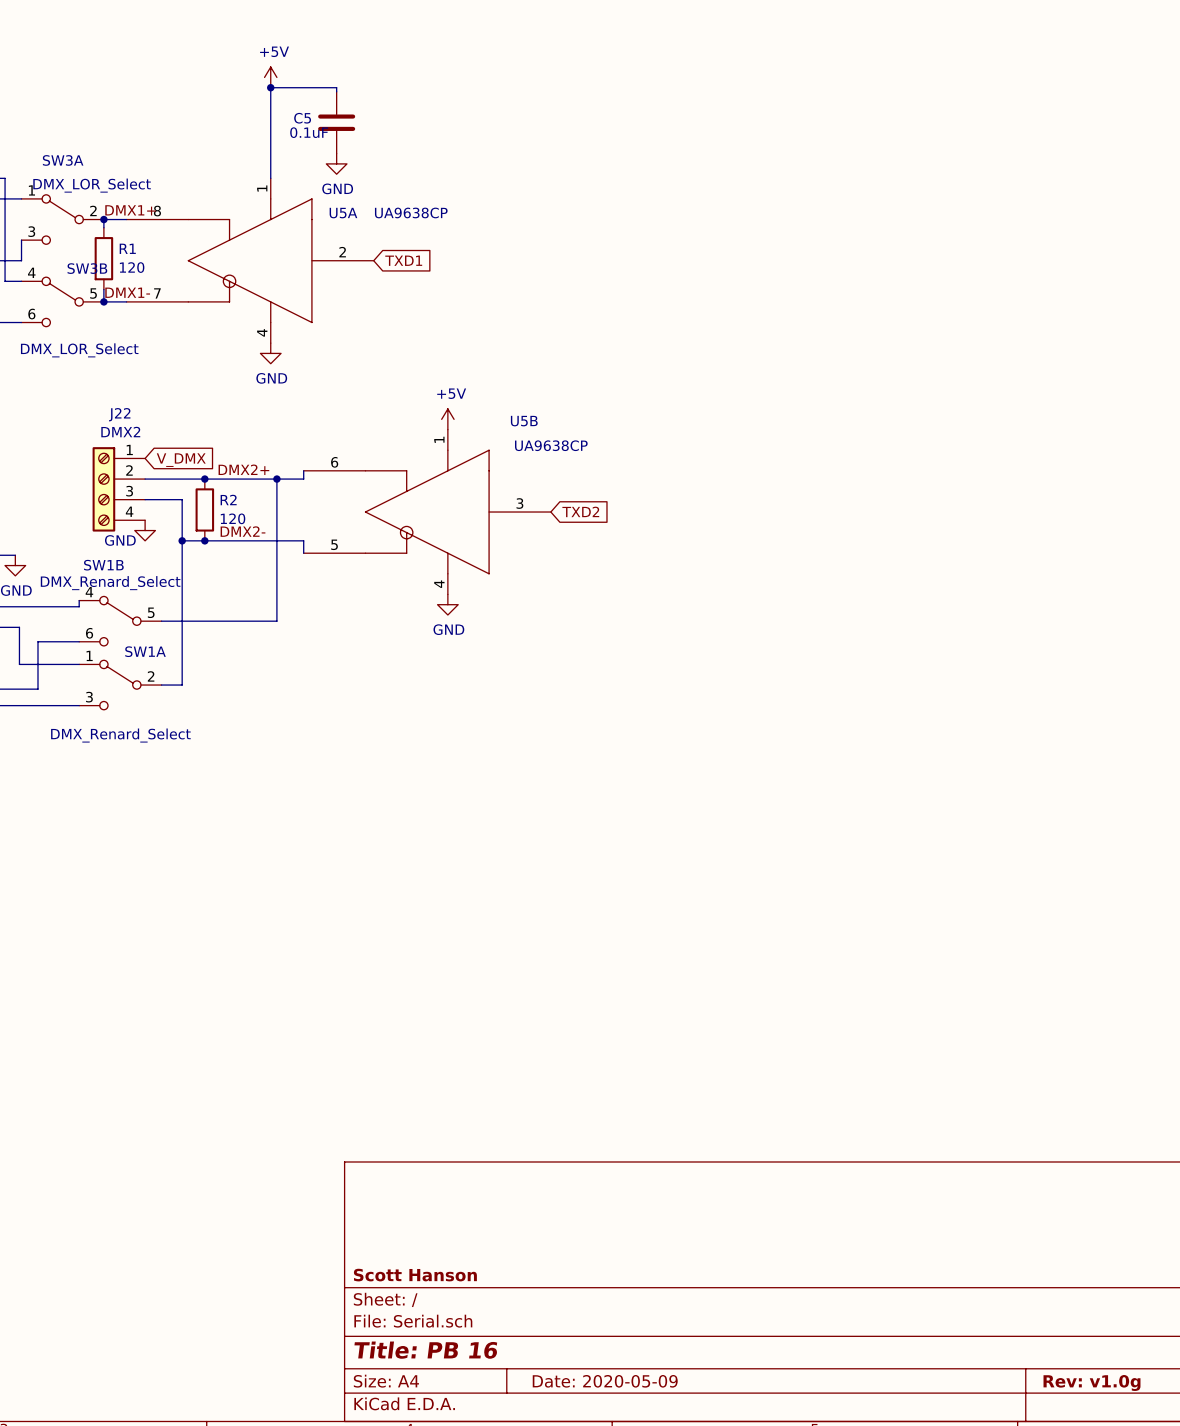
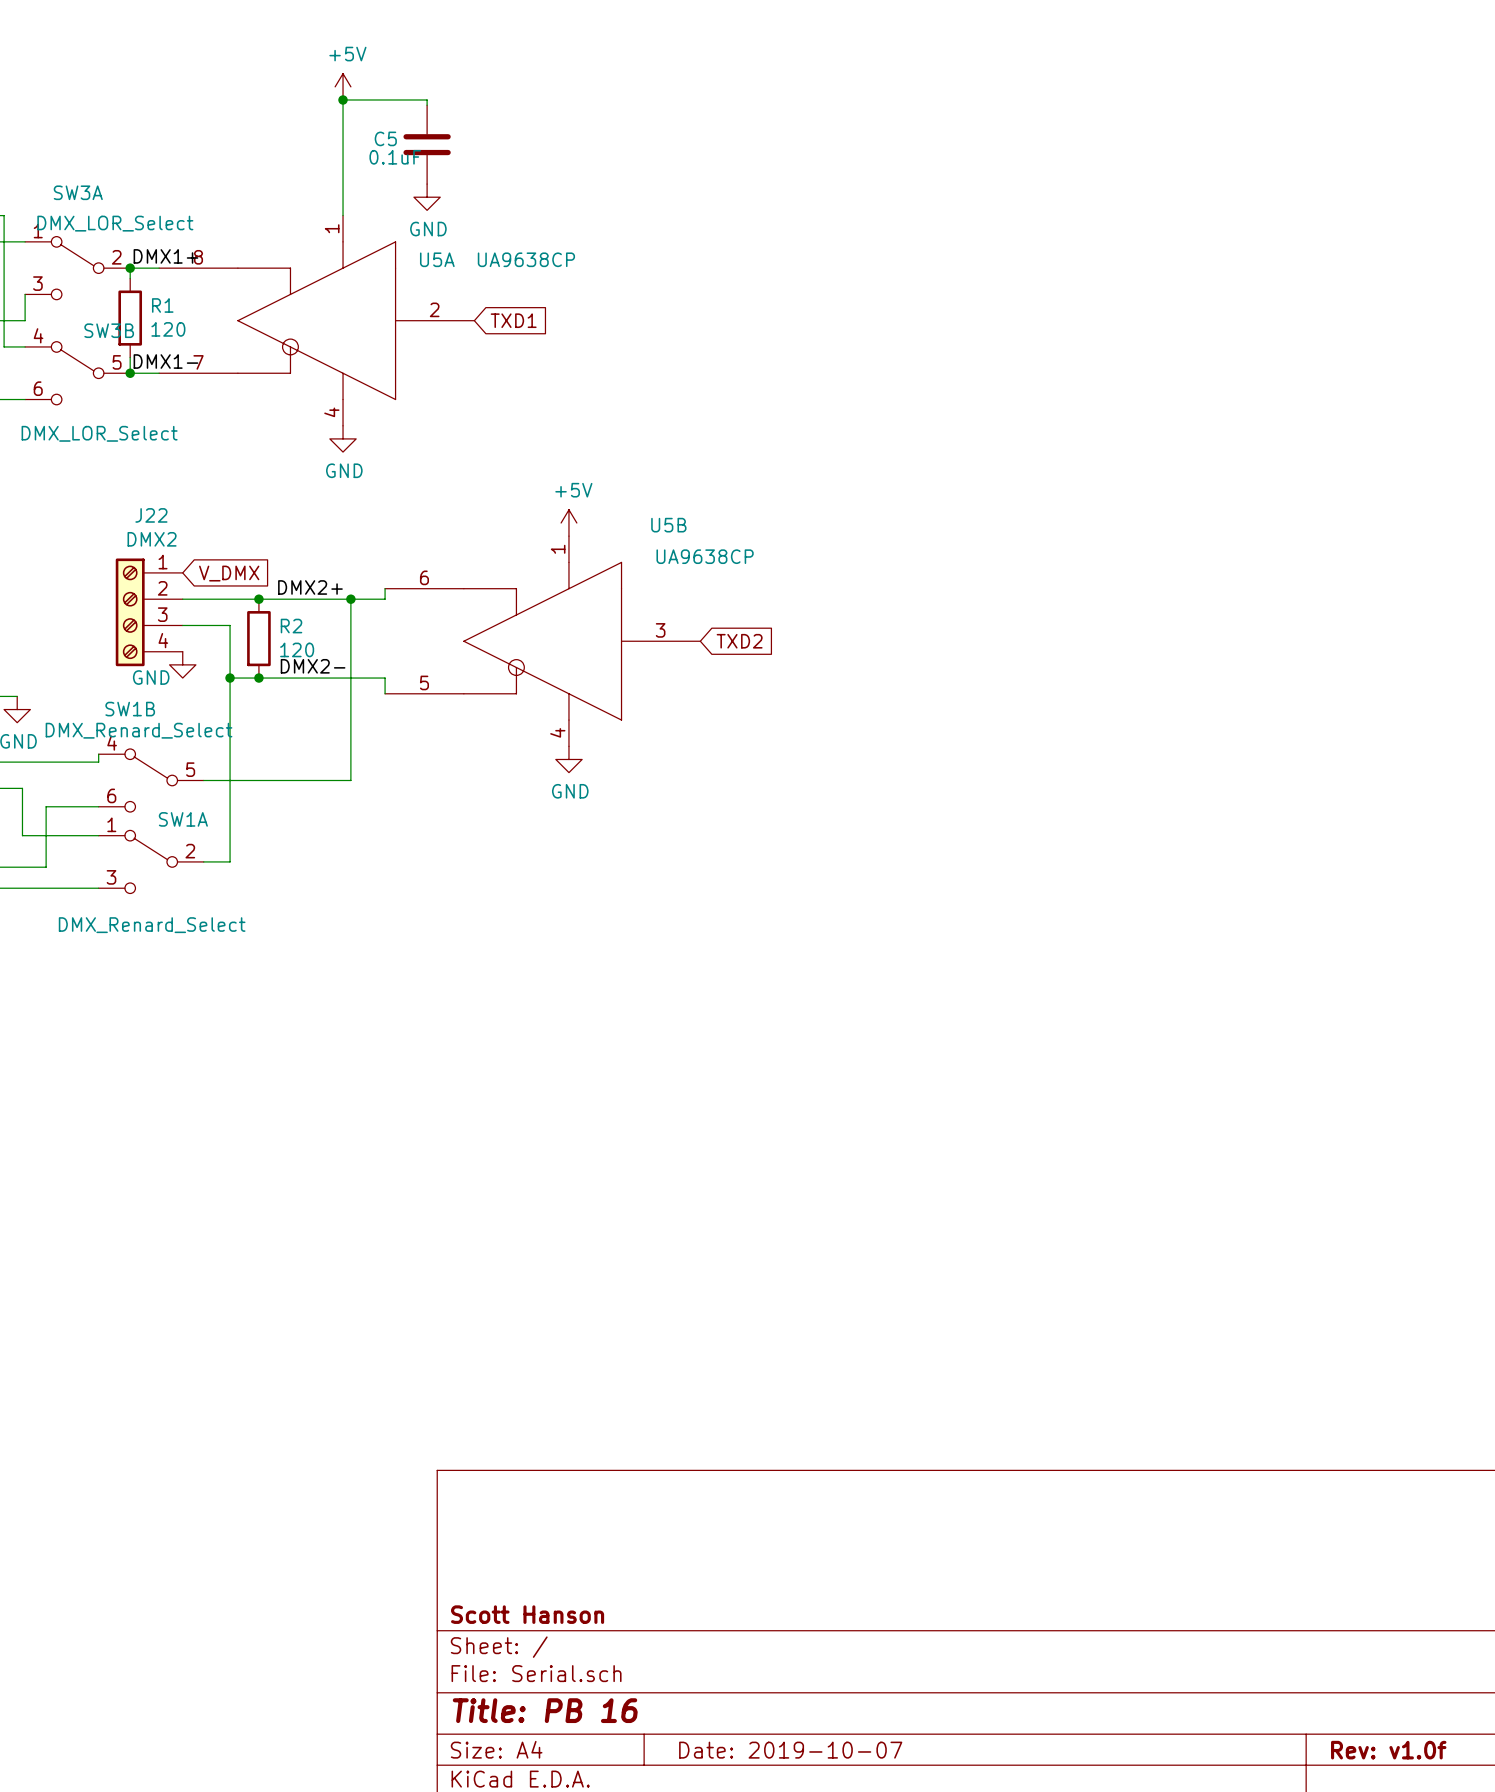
title block: Date: 2020-05-09 (605, 1381) -> Date: 2019-10-07 (790, 1750)
title block: Rev: v1.0g (1091, 1382) -> Rev: v1.0f (1388, 1750)

